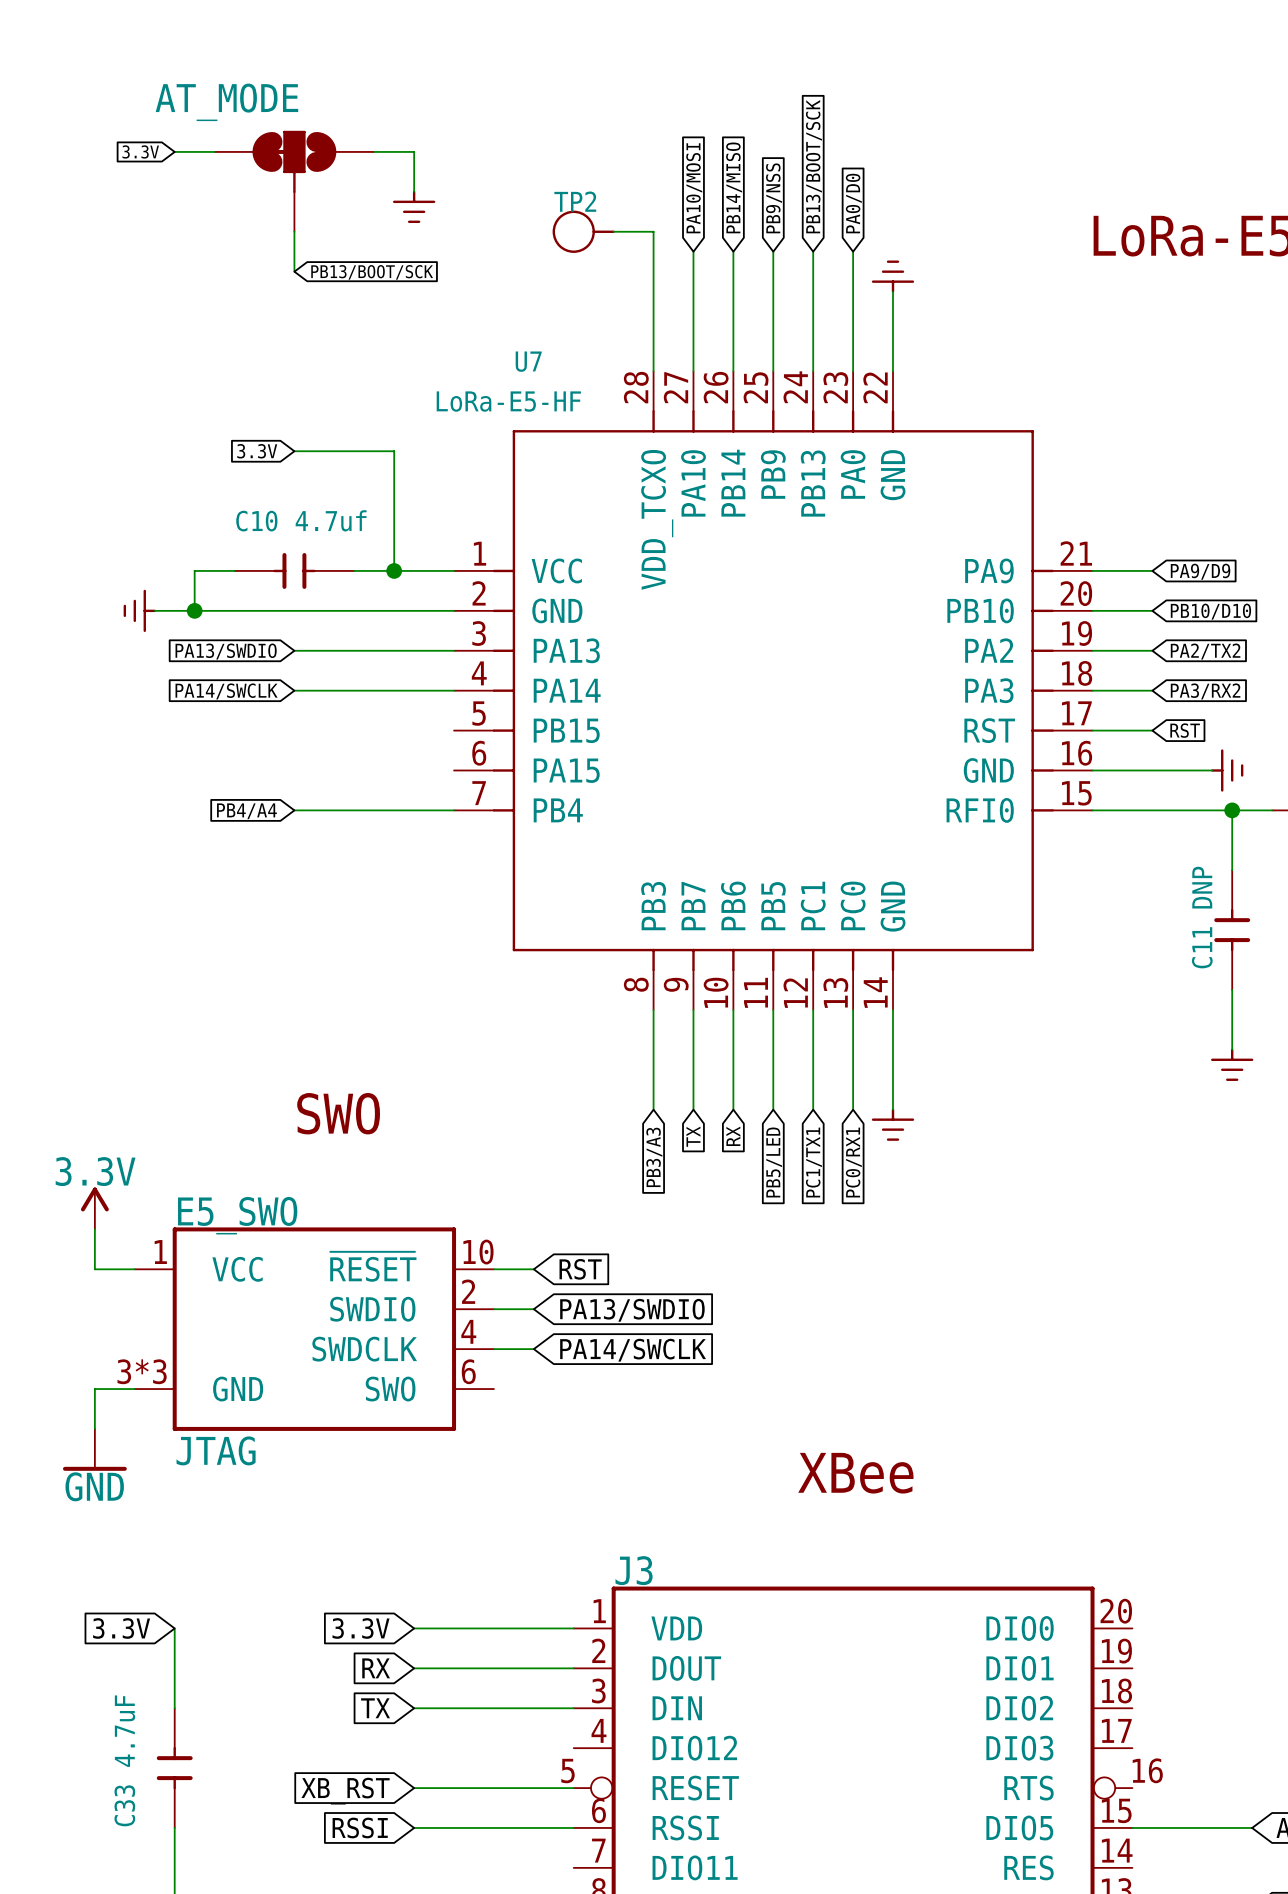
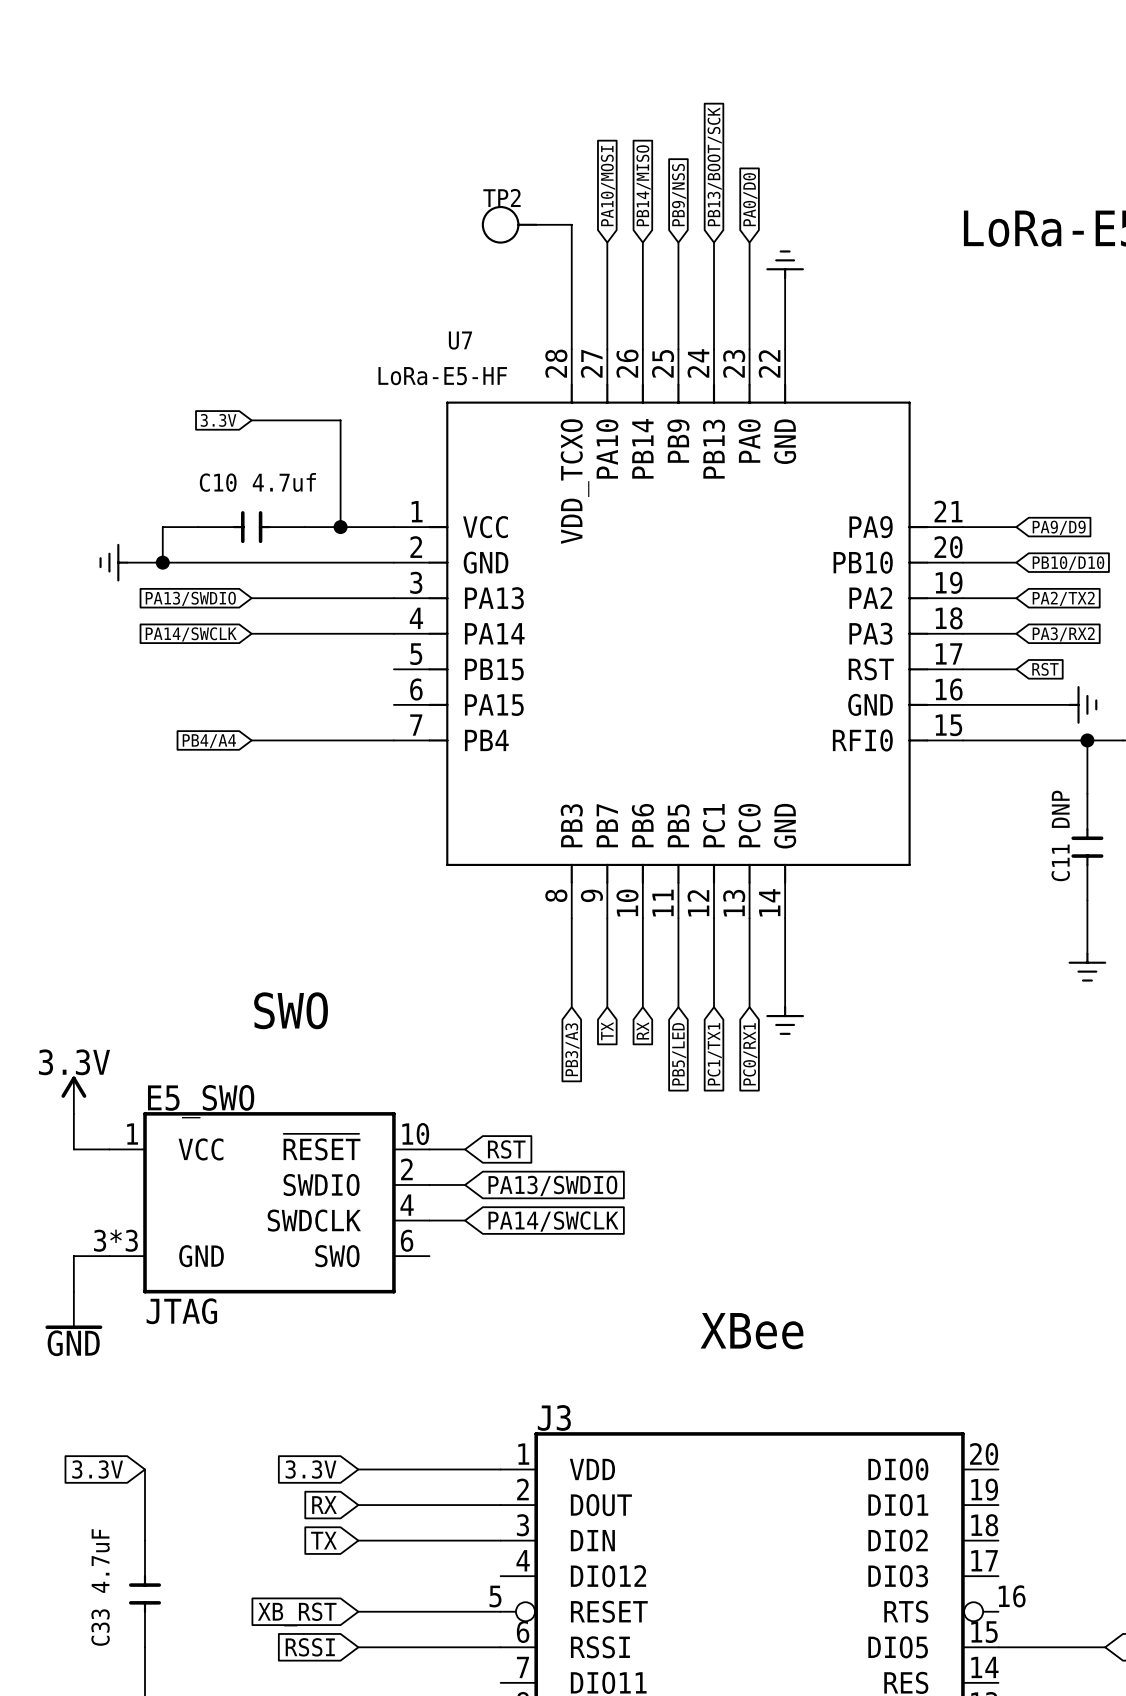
global label: 3.3V (140, 151) -> none
wire: (174, 151) (214, 151) -> none
wire: (374, 151) (414, 151) (414, 191) -> none
AT_MODE: (294, 181) -> none
power symbol: (414, 206) -> none
wire: (294, 231) (294, 271) -> none
global label: PB13/BOOT/SCK (372, 272) -> none

